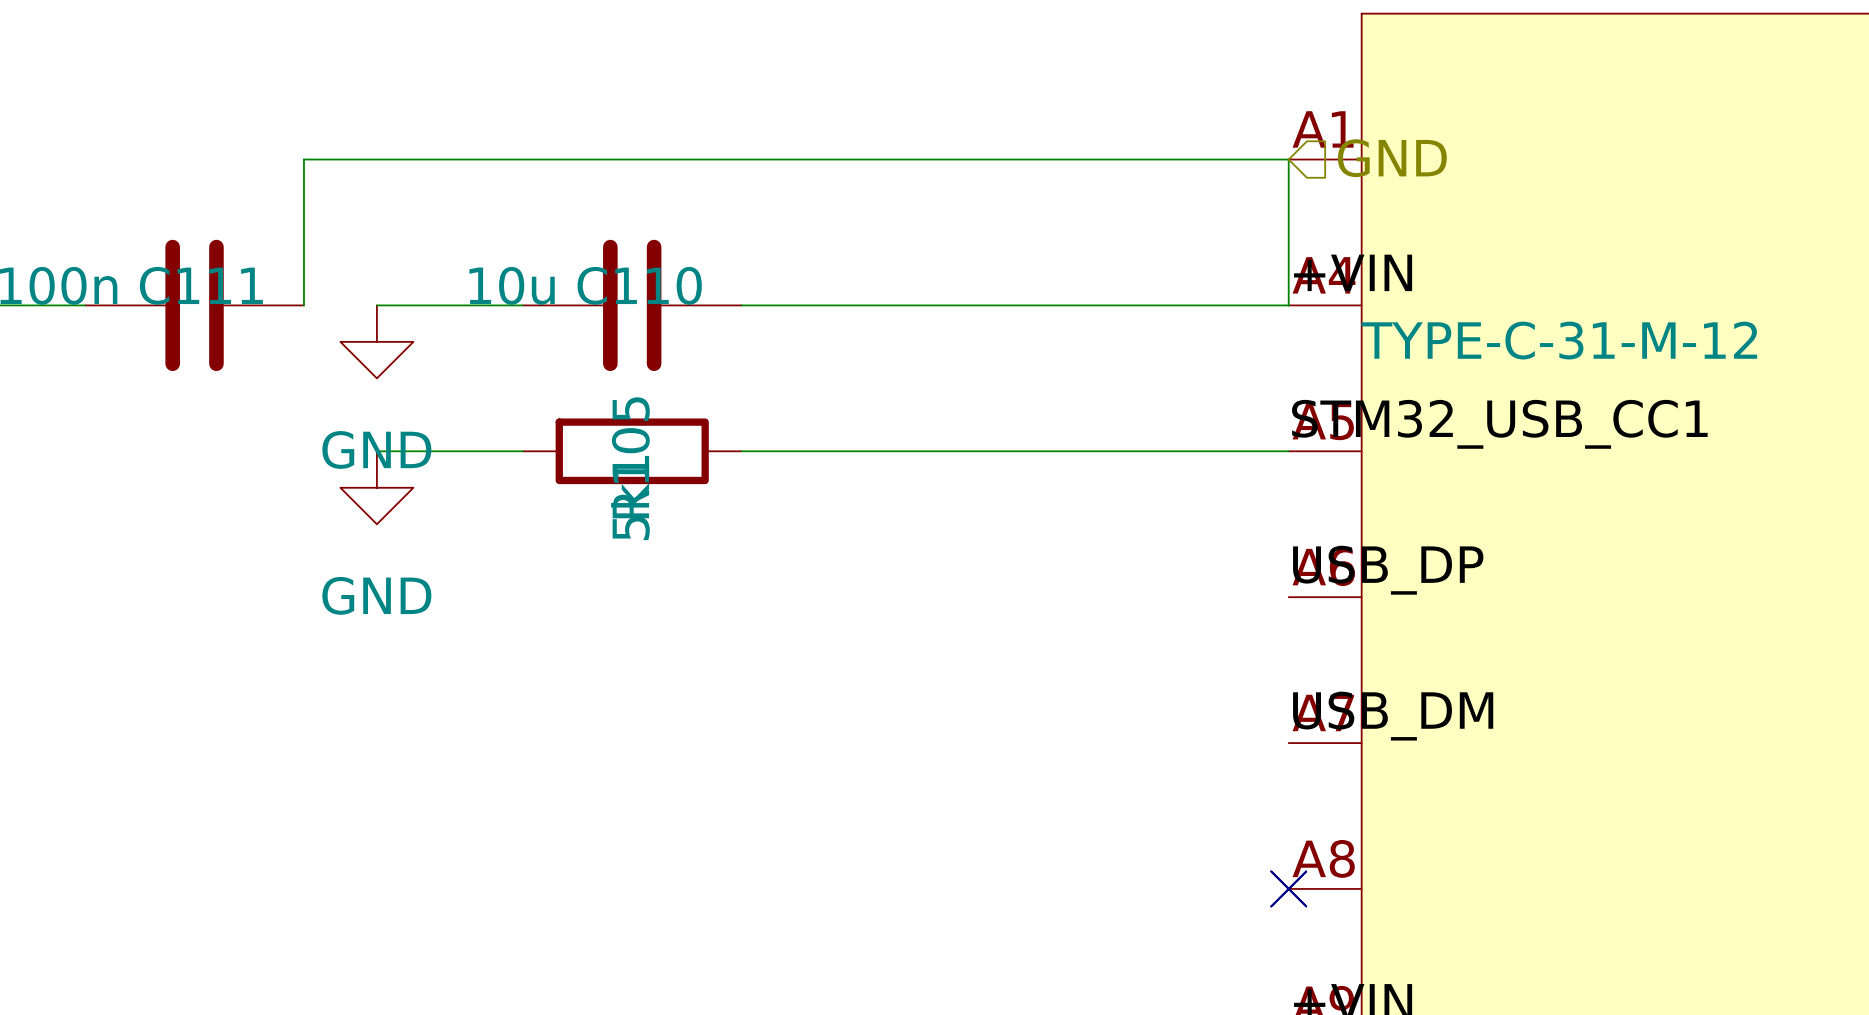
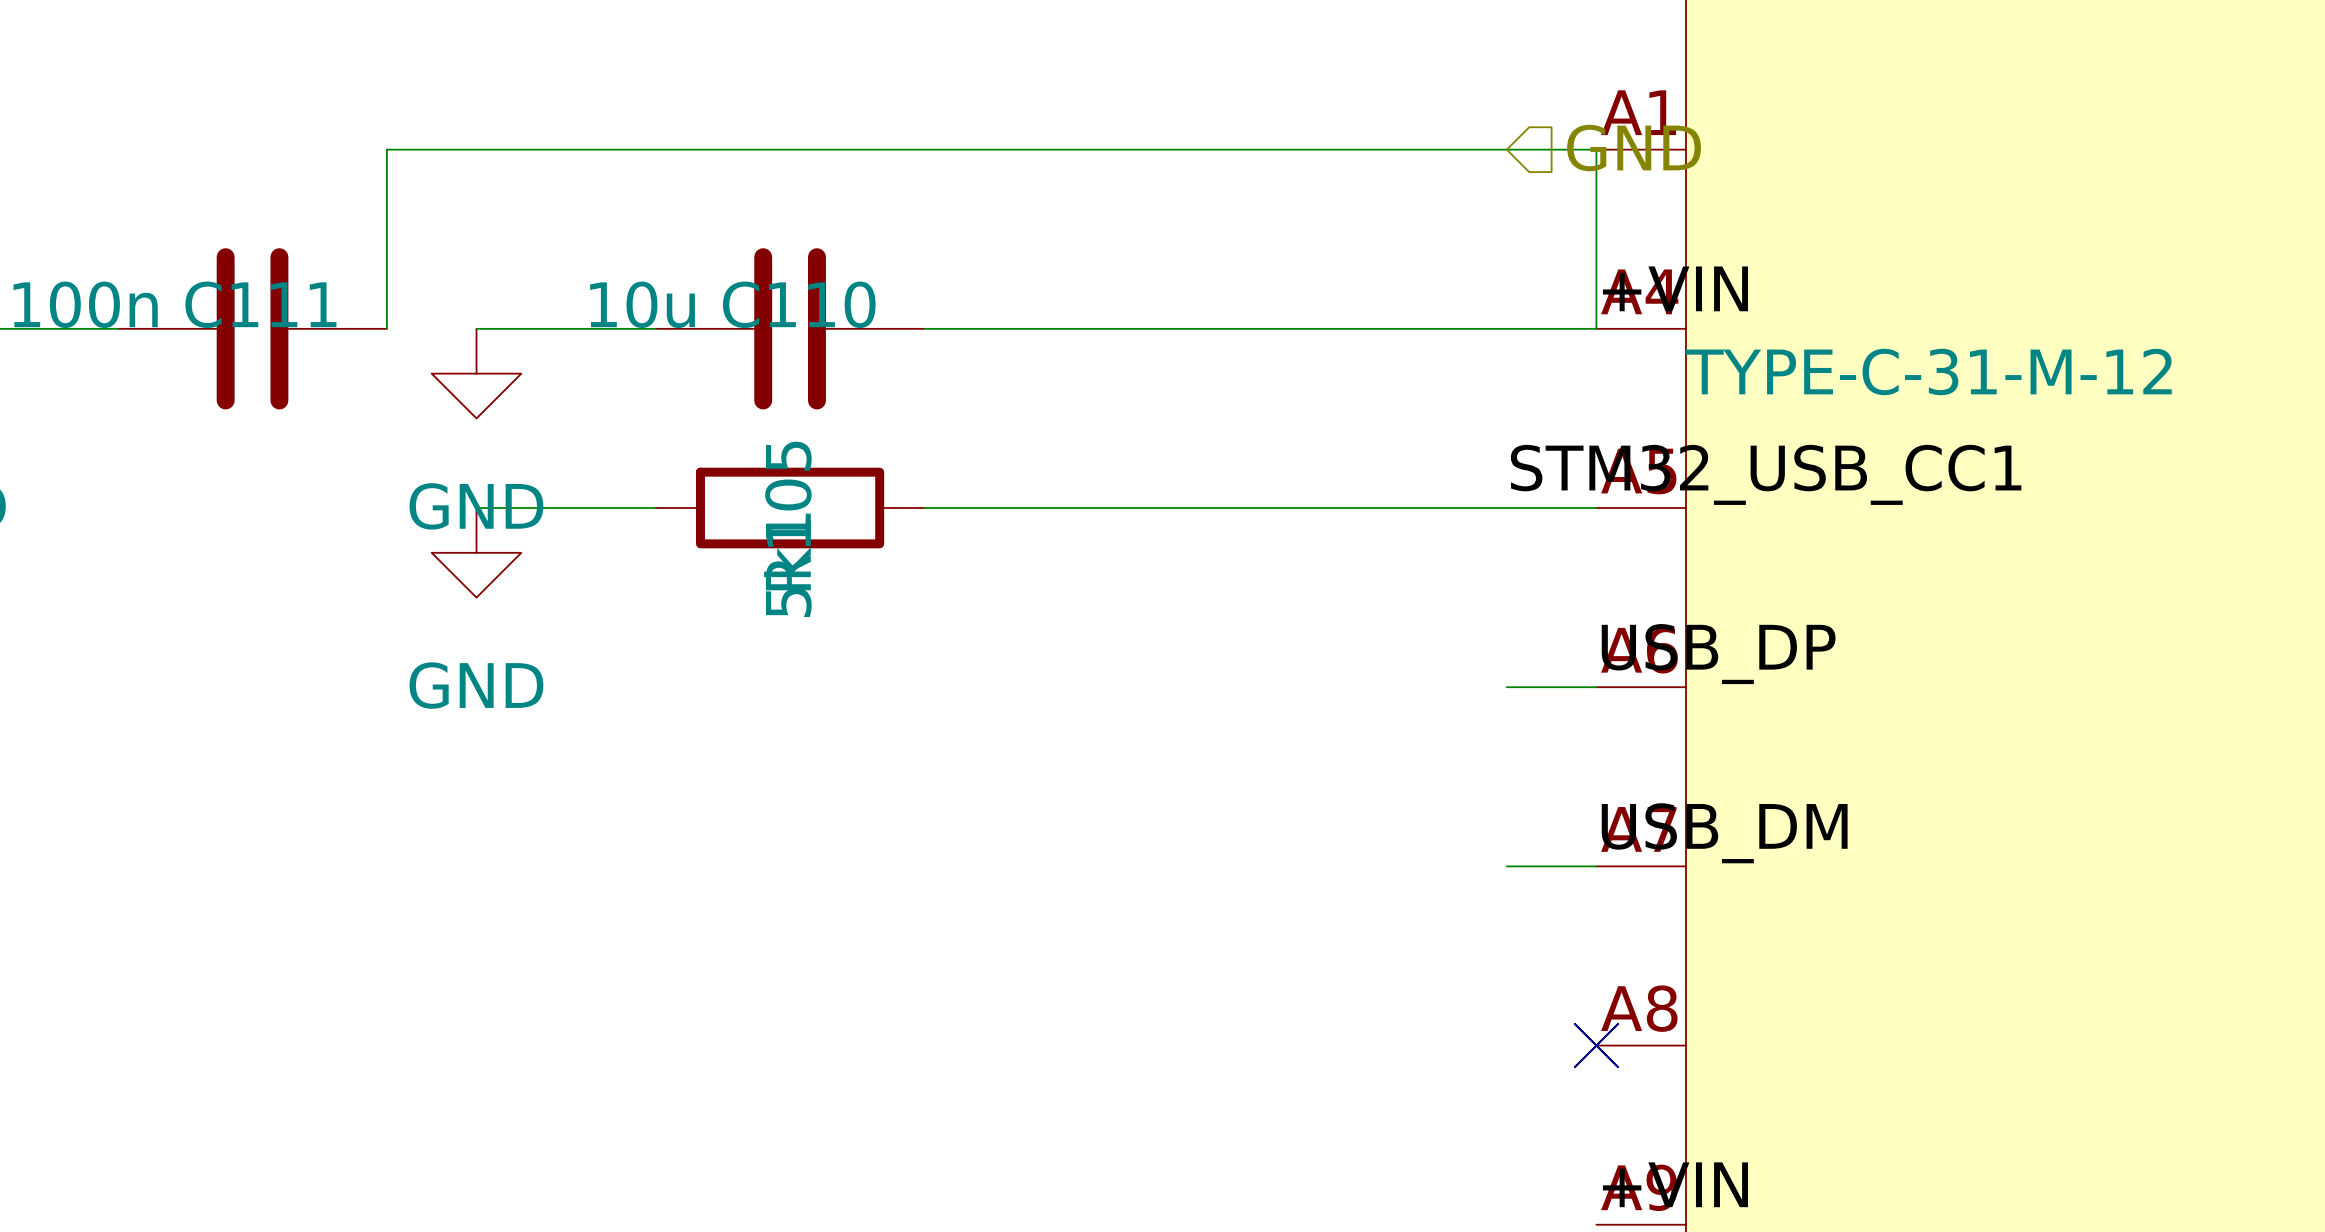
hierarchical label position: GND (1392, 158) -> GND (1634, 148)
label position: STM32_USB_CC1 (1499, 424) -> STM32_USB_CC1 (1766, 474)
wire: none -> (1506, 687) (1596, 687)
wire: none -> (1506, 866) (1596, 866)

